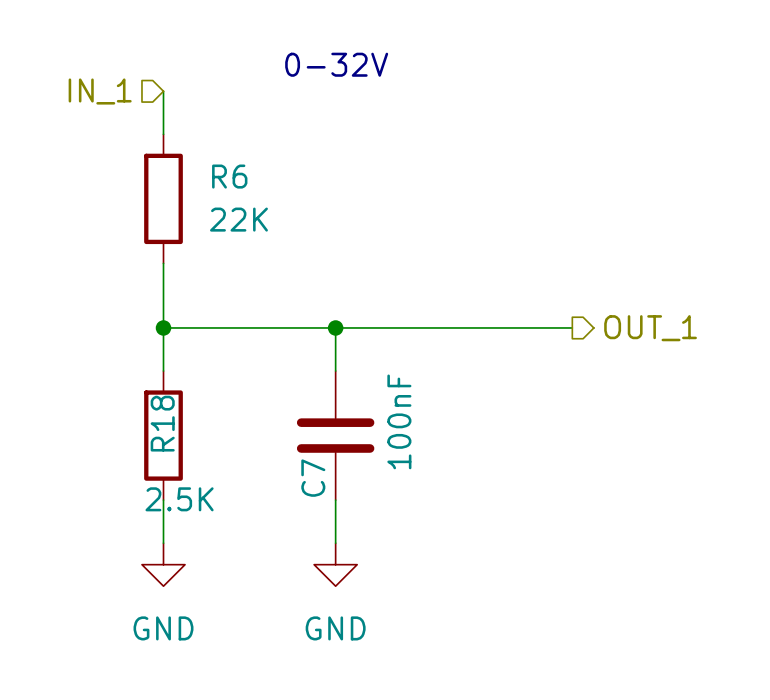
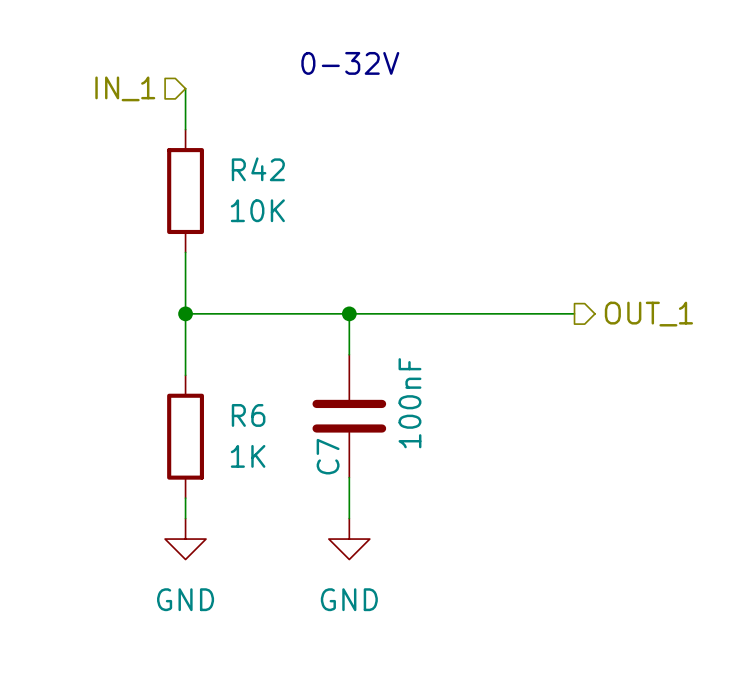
R6 name: R6 (229, 176) -> R42 (258, 169)
R6 value: 22K (238, 219) -> 10K (257, 210)
R18: 2.5K (163, 435) -> none
R6: none -> 1K (185, 436)

